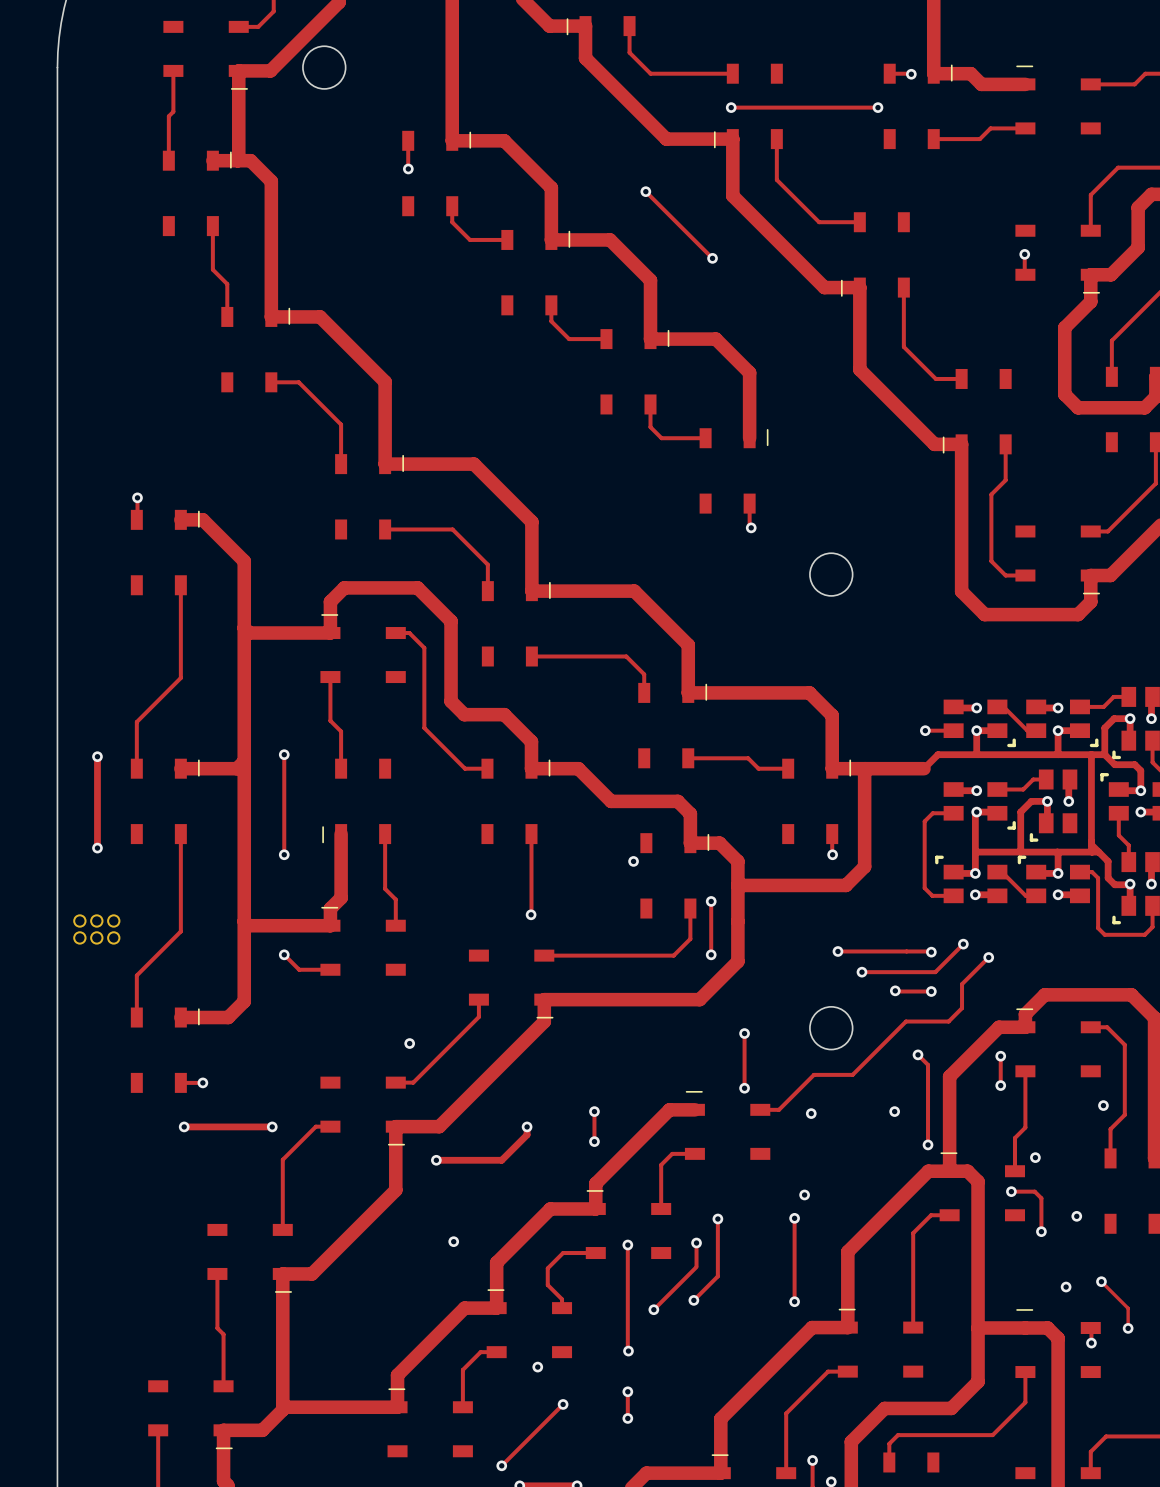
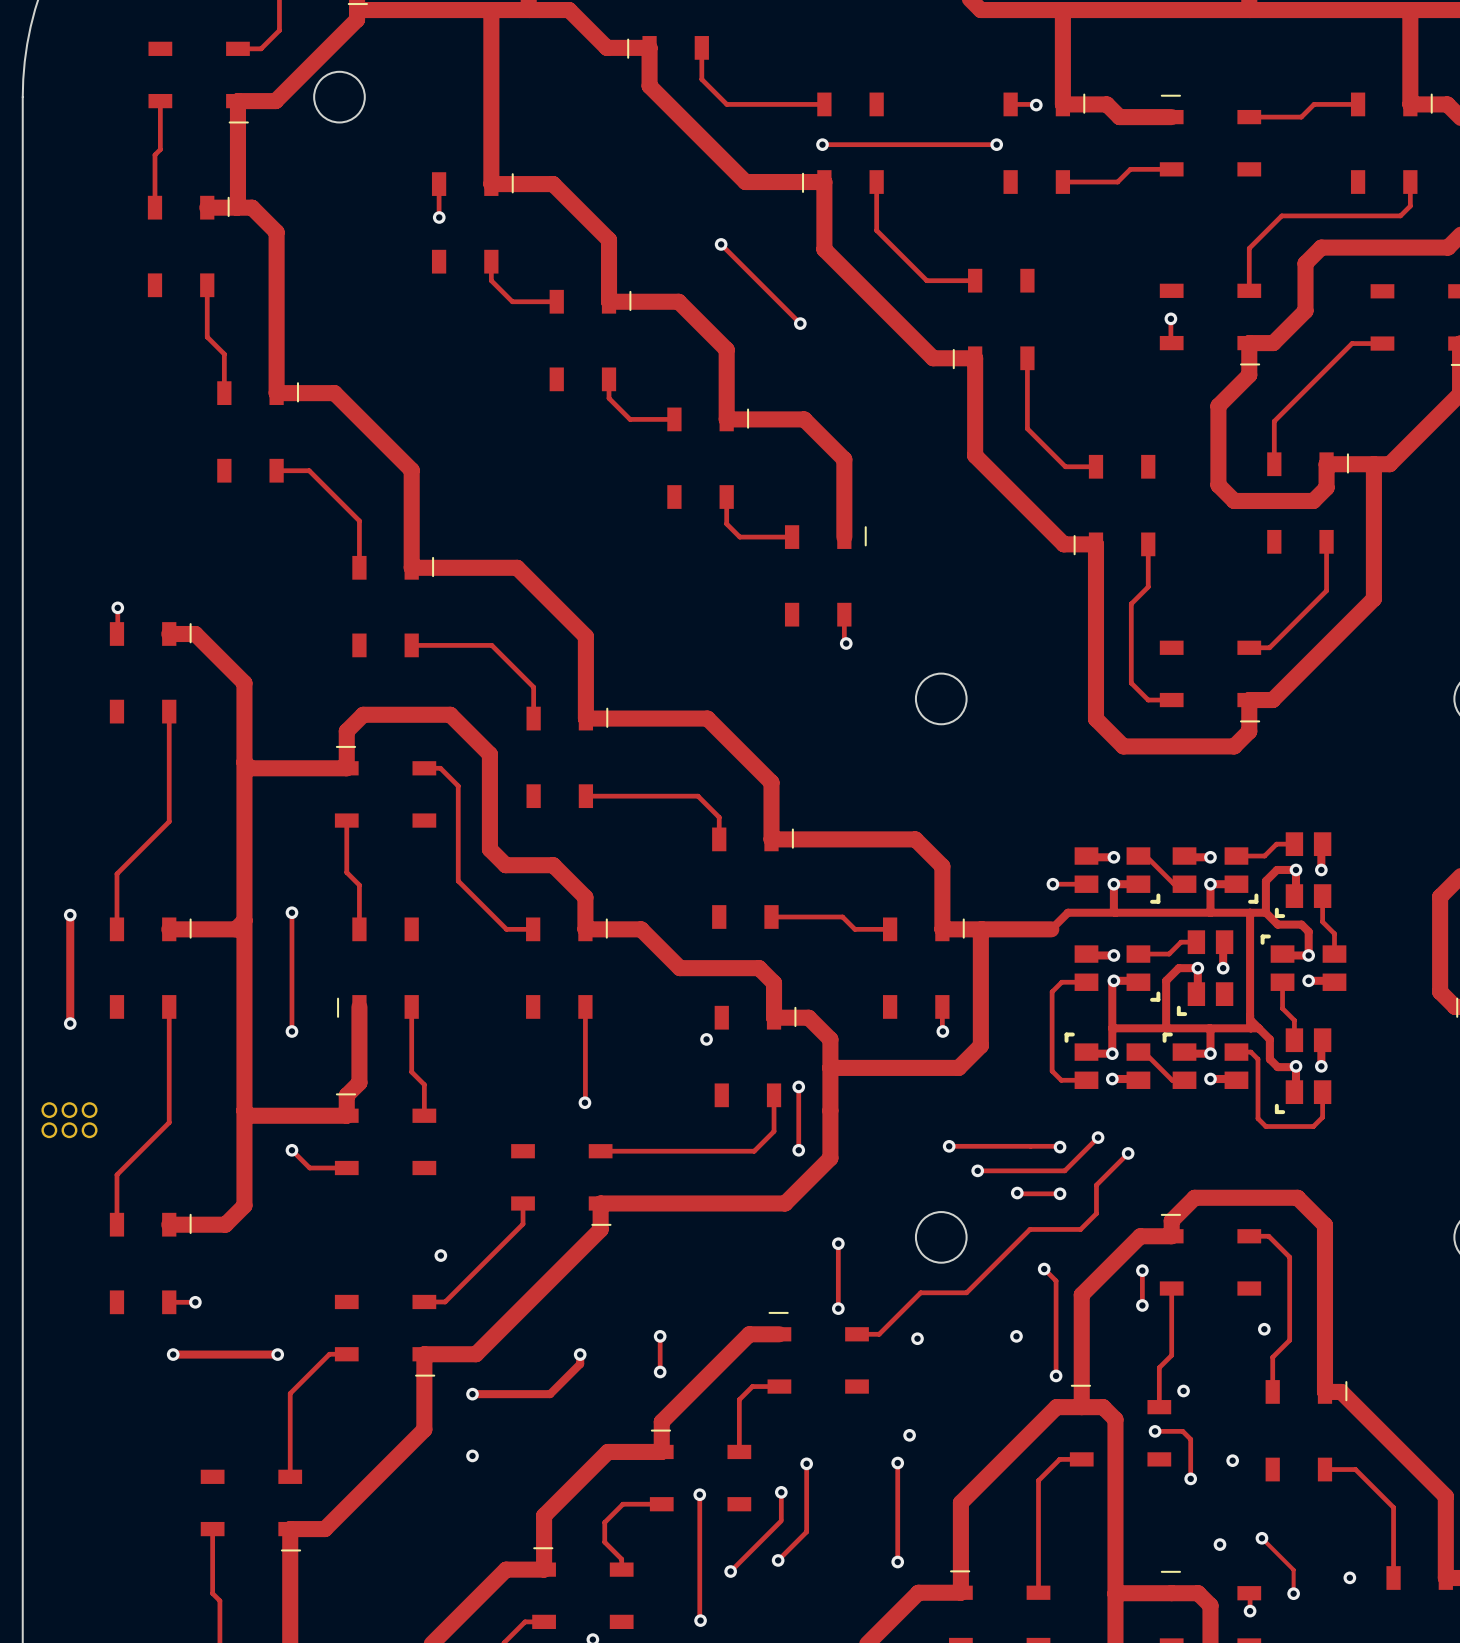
via position: (453, 1241) -> (472, 1455)

